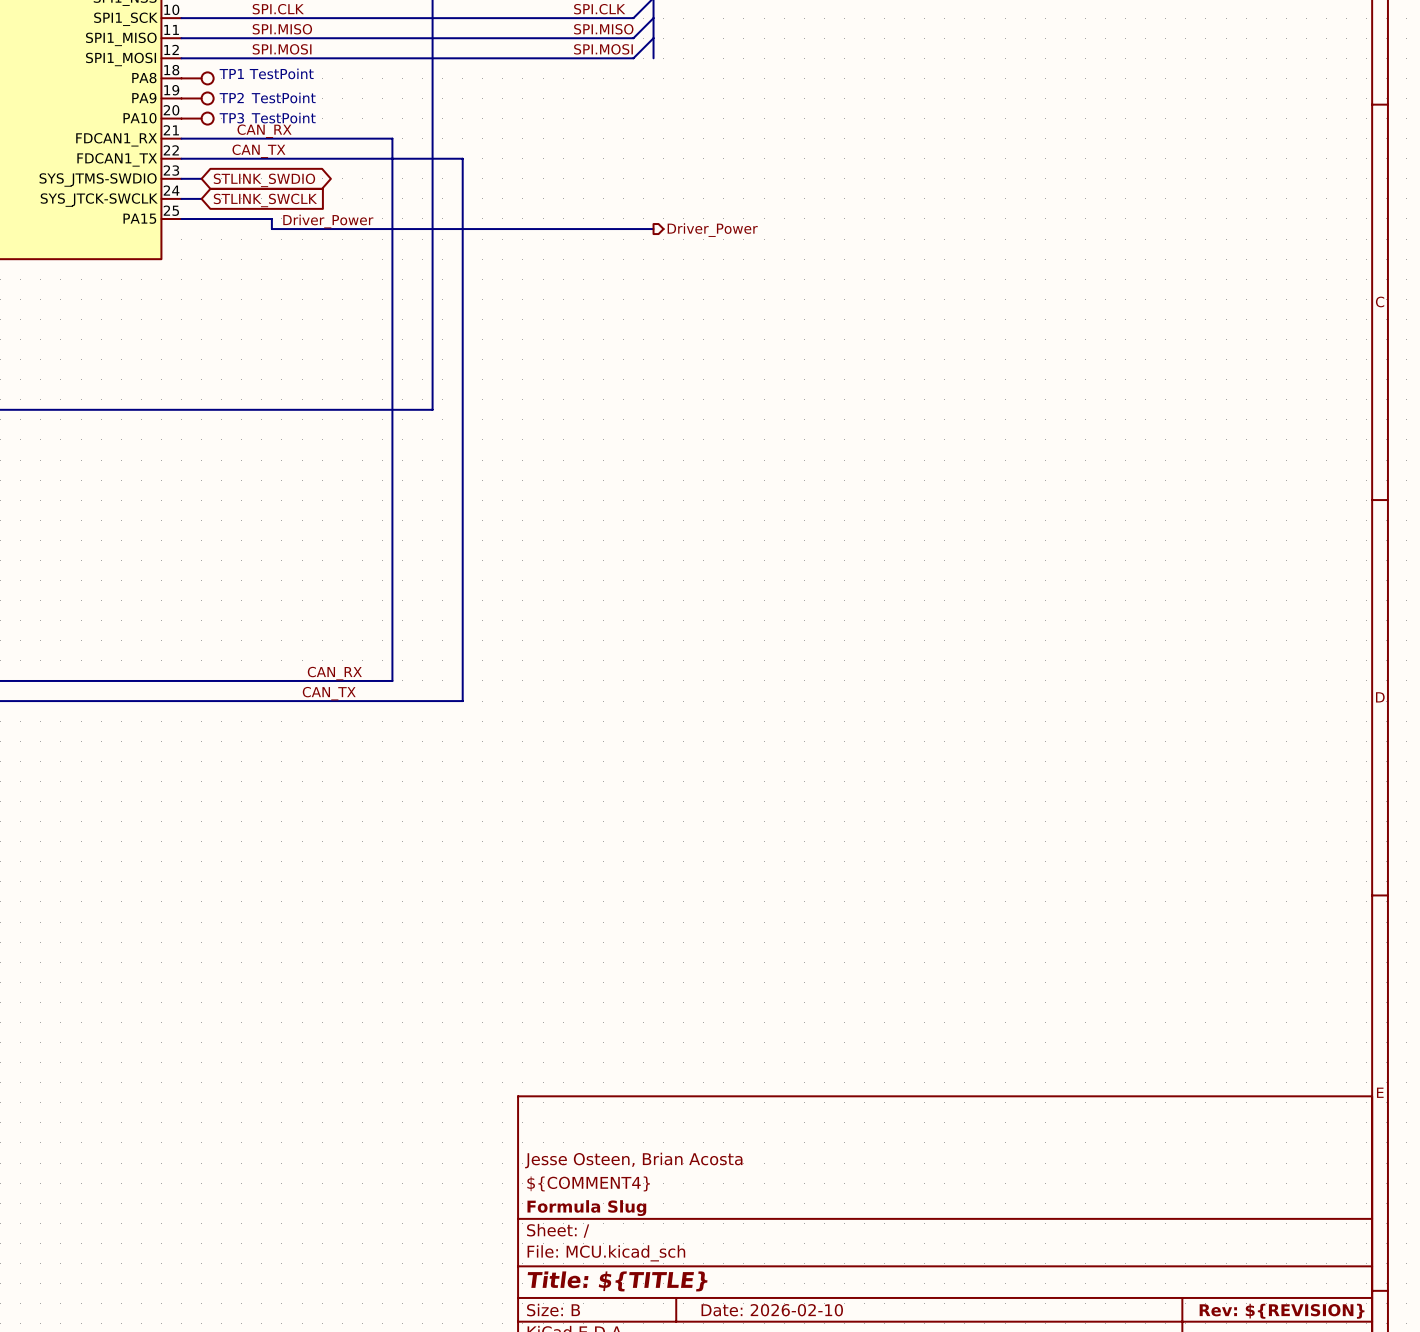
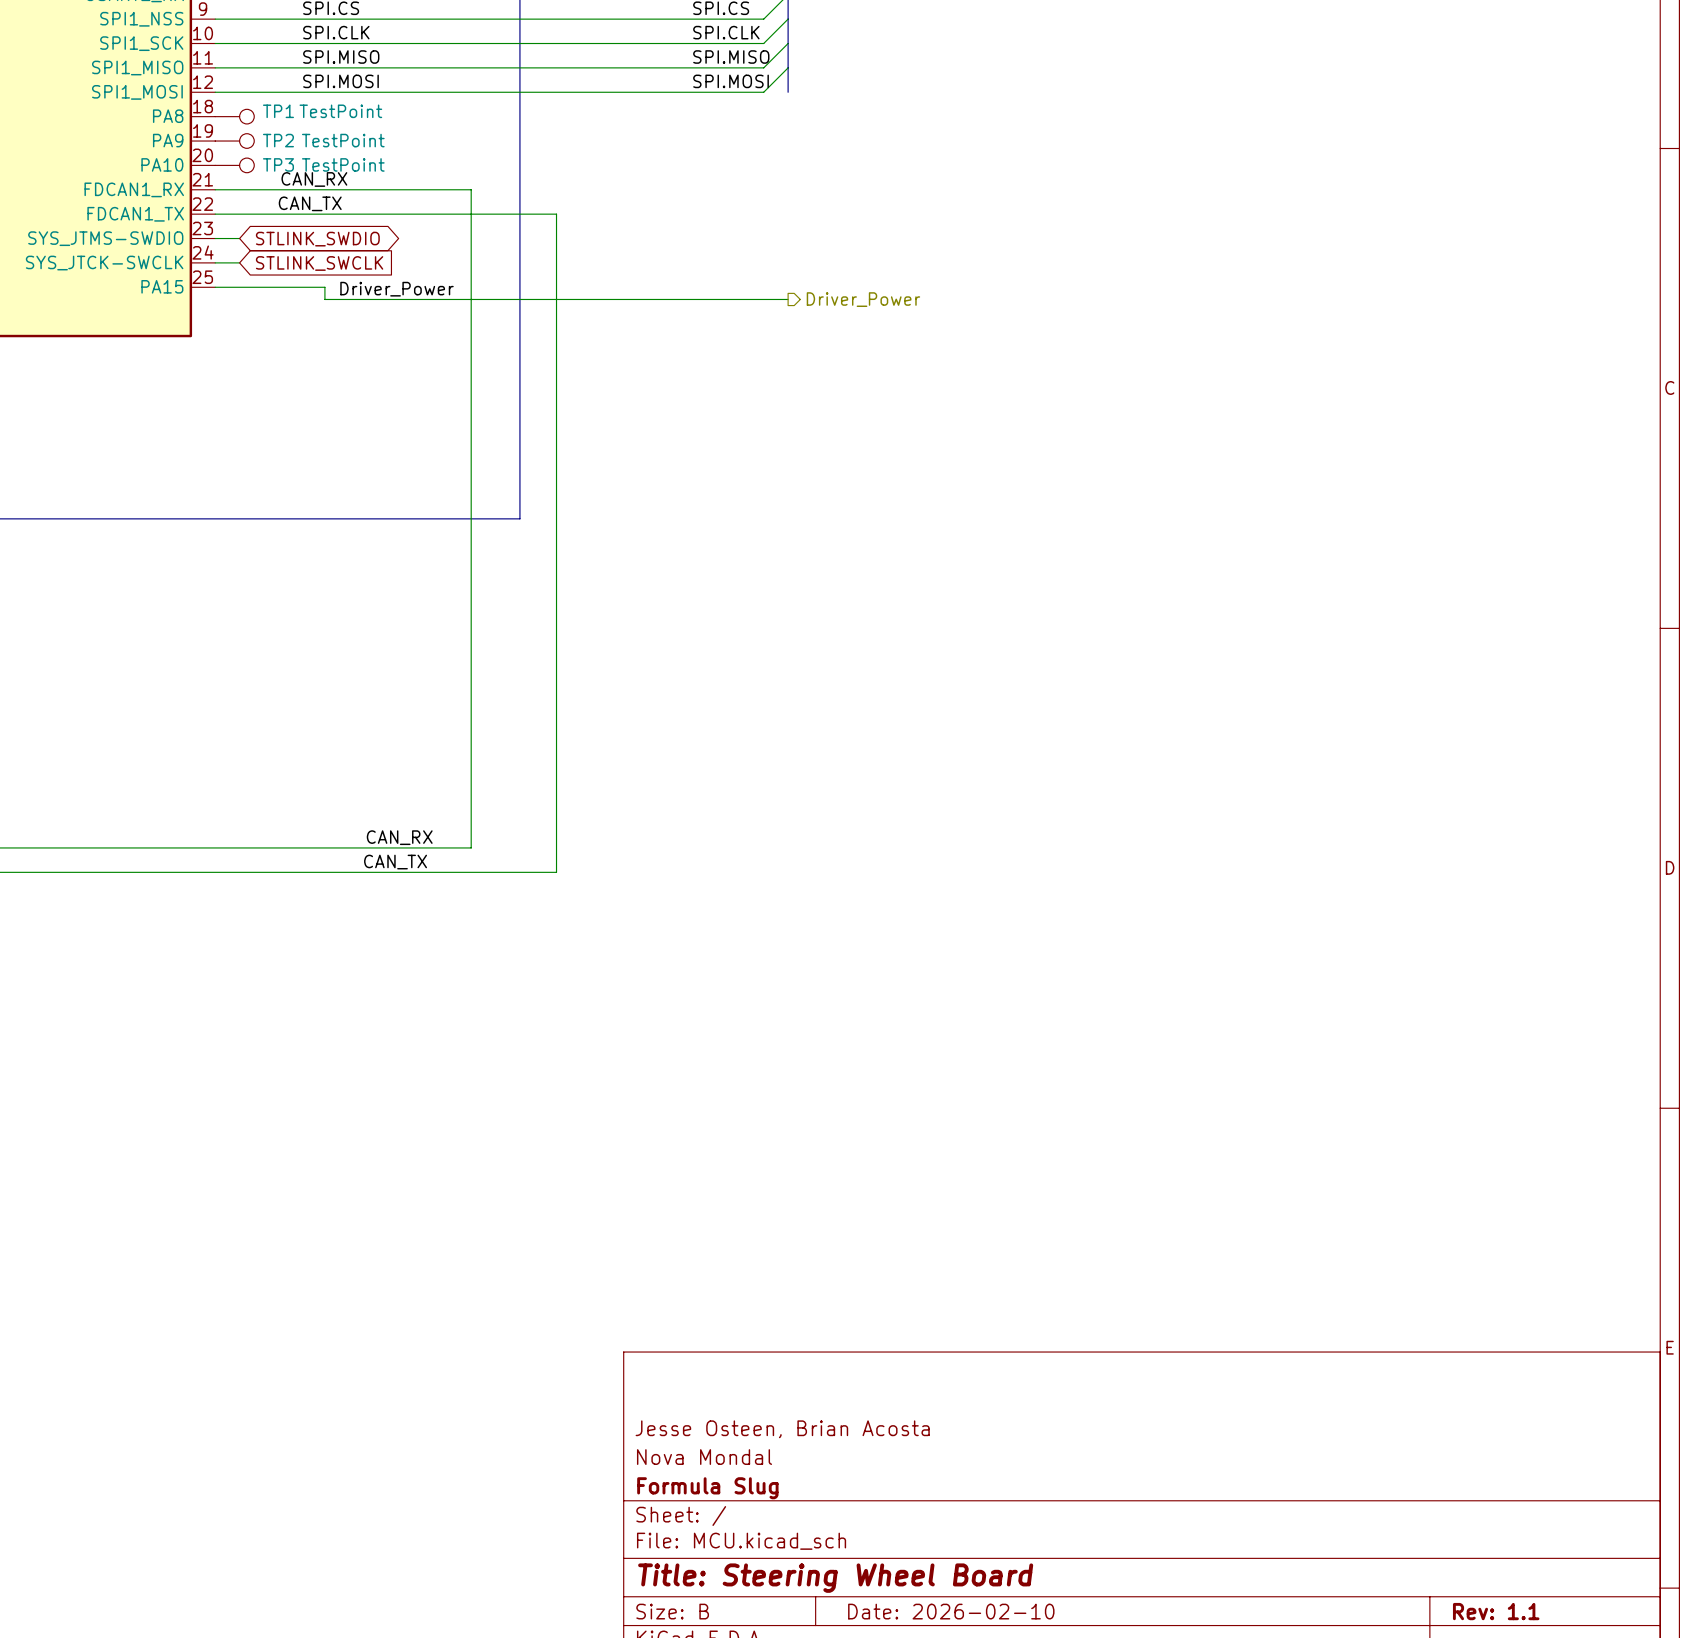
title block: ${COMMENT4} (588, 1183) -> Nova Mondal (704, 1457)
title block: Title: ${TITLE} (617, 1281) -> Title: Steering Wheel Board (835, 1578)
title block: Rev: ${REVISION} (1282, 1311) -> Rev: 1.1 (1496, 1611)

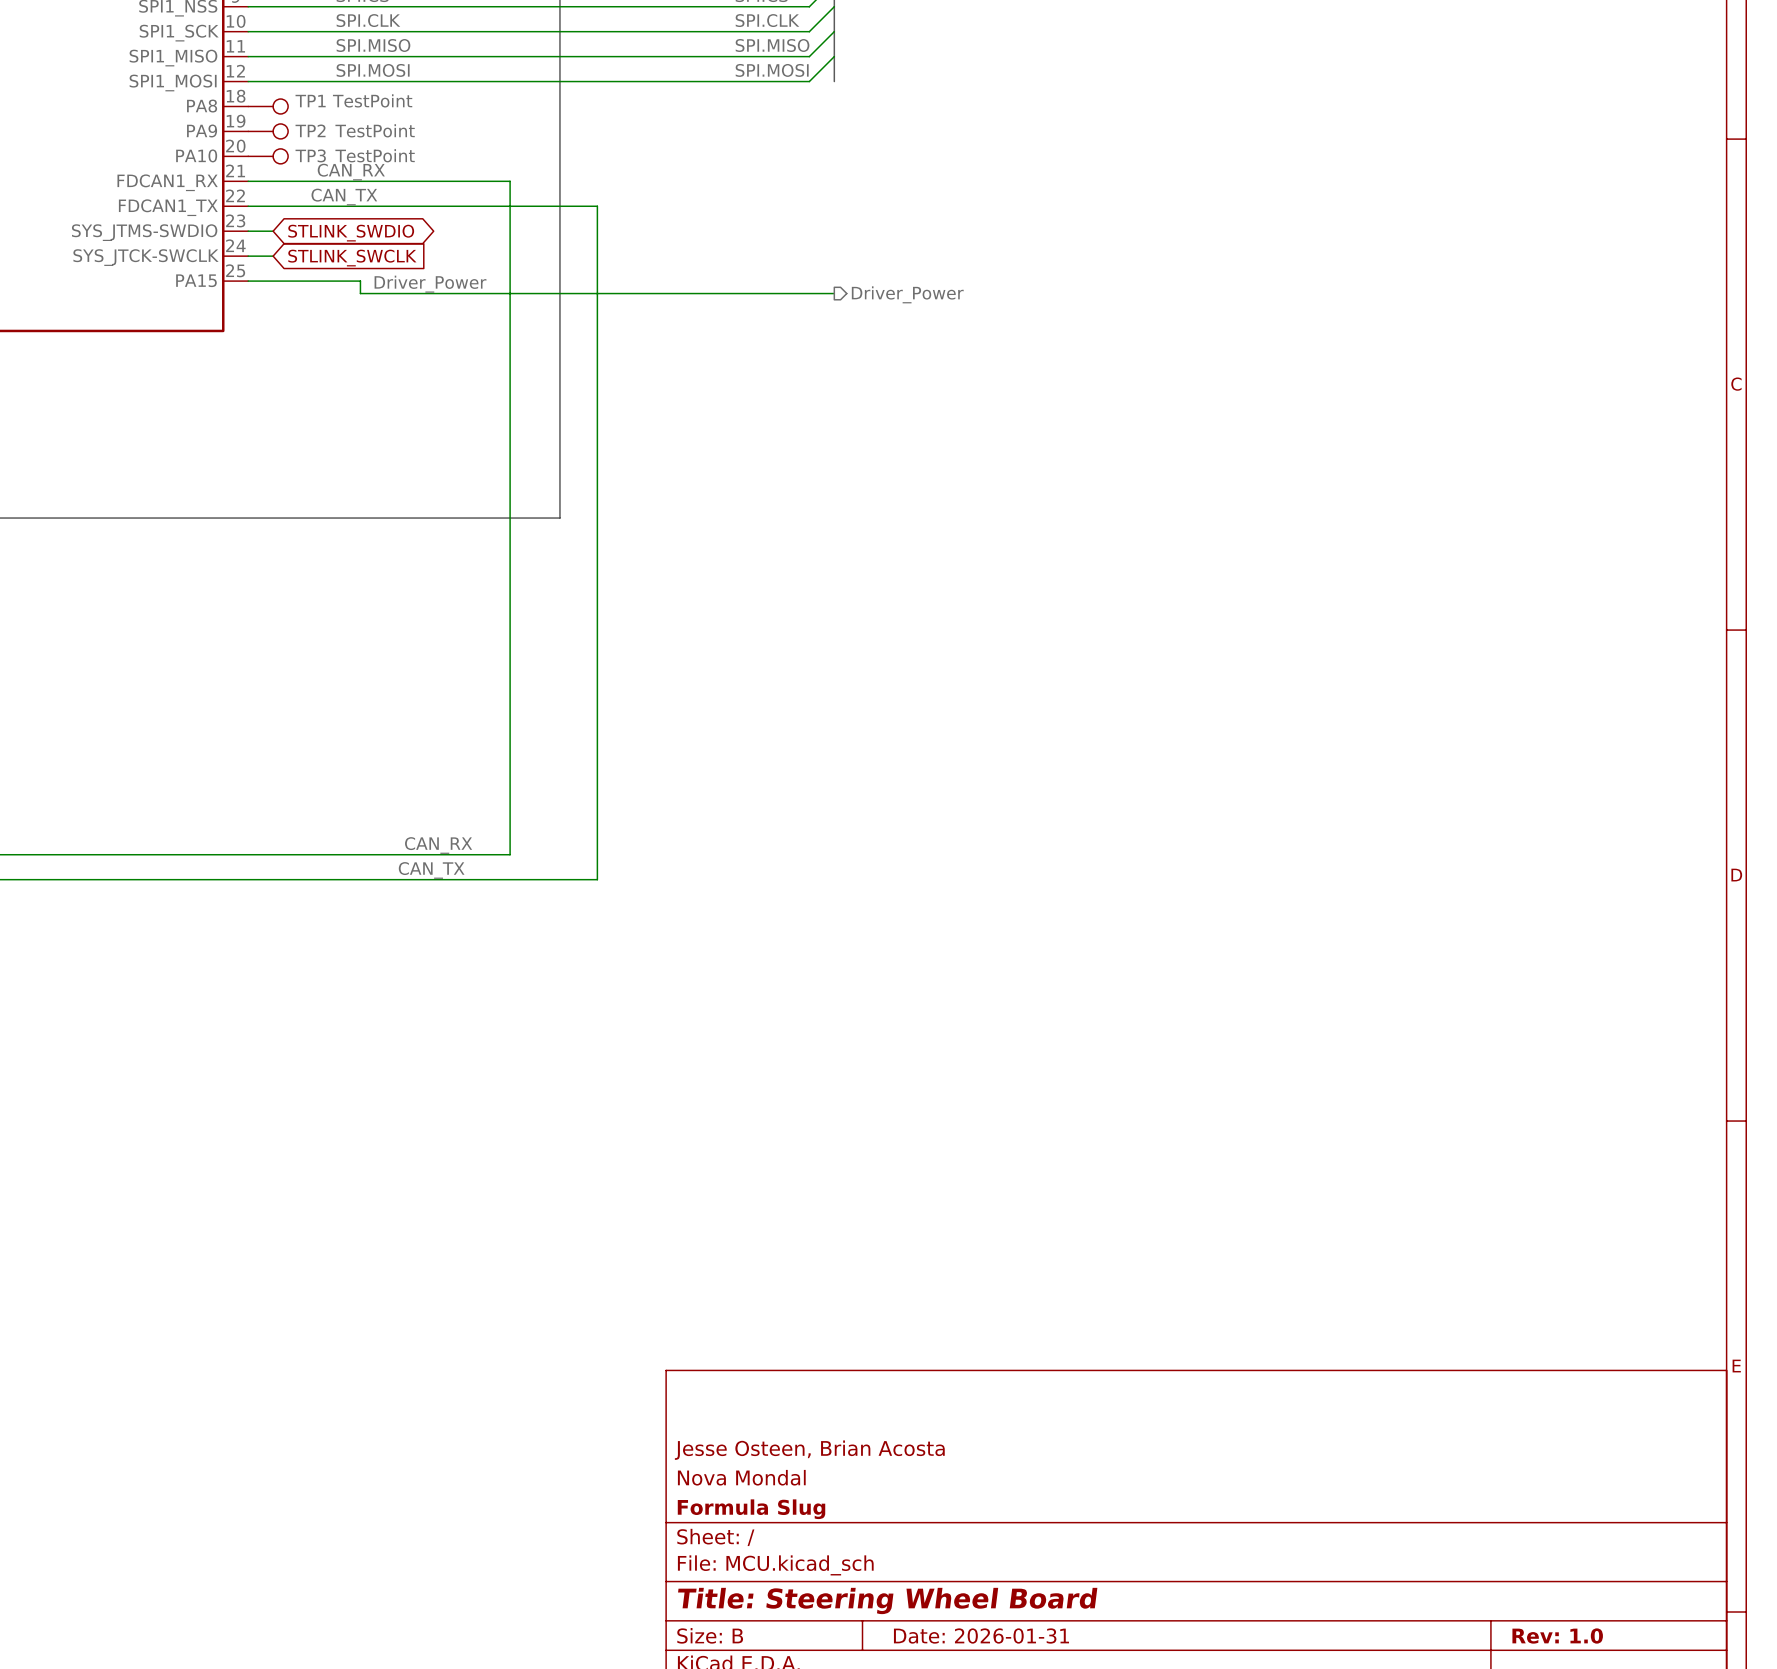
title block: Date: 2026-02-10 (951, 1611) -> Date: 2026-01-31 (981, 1636)
title block: Rev: 1.1 (1496, 1611) -> Rev: 1.0 (1557, 1636)

